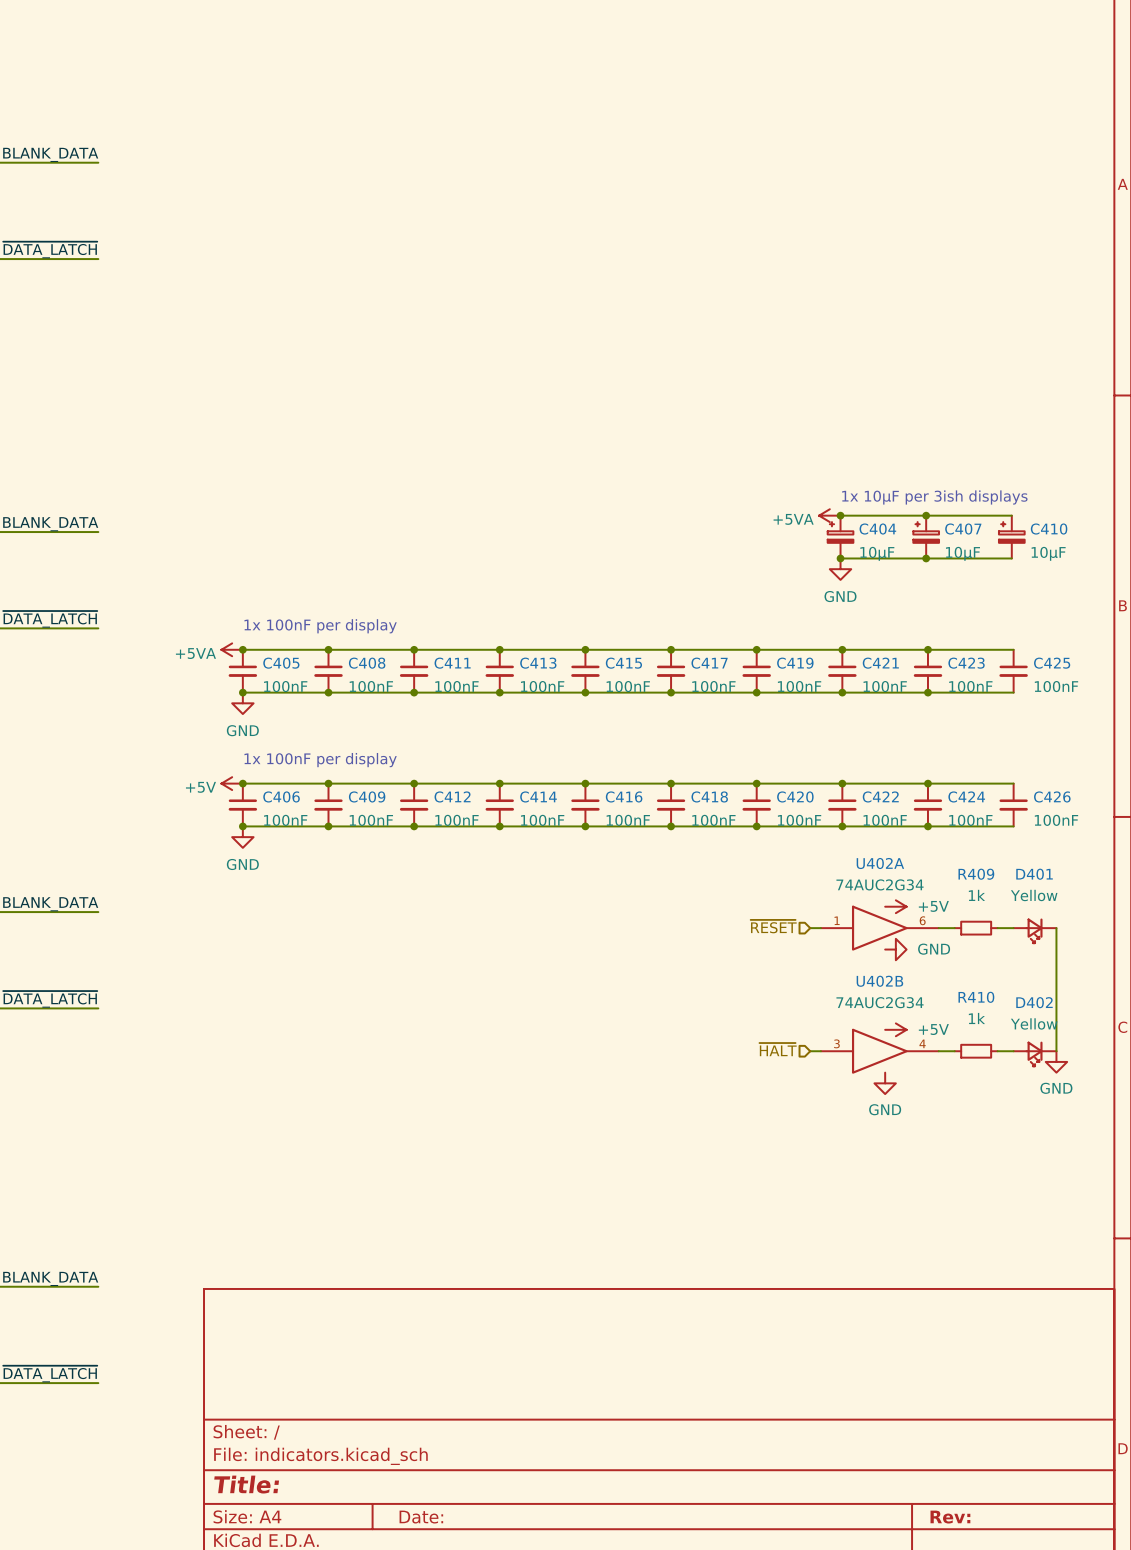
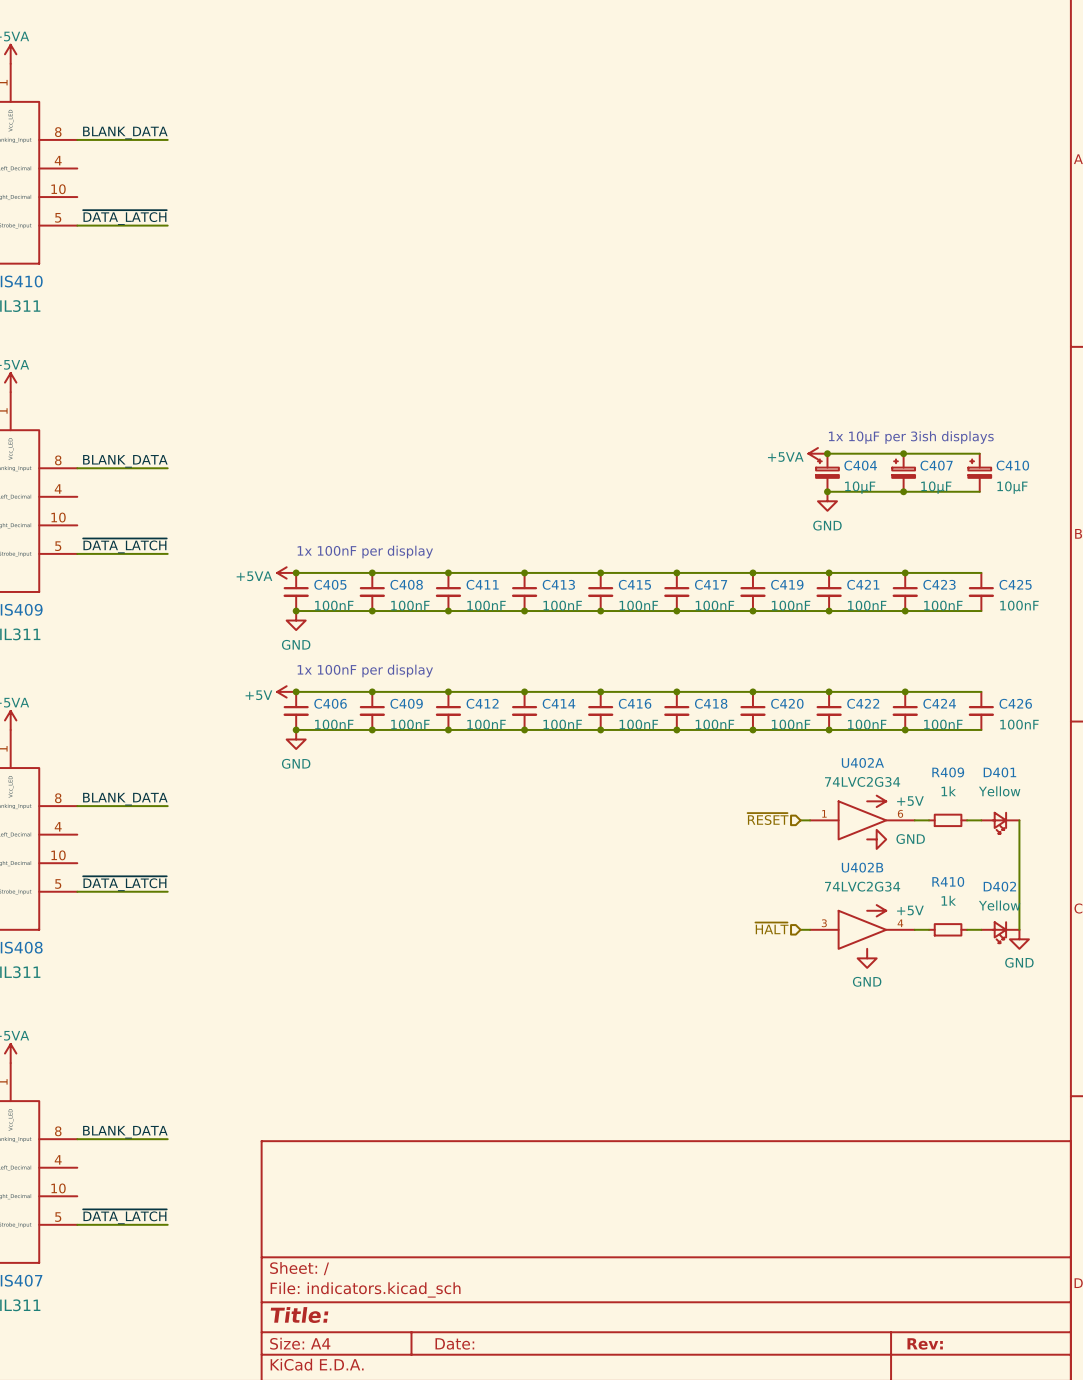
U402A value: 74AUC2G34 (880, 884) -> 74LVC2G34 (862, 781)
U402B value: 74AUC2G34 (880, 1002) -> 74LVC2G34 (862, 886)

